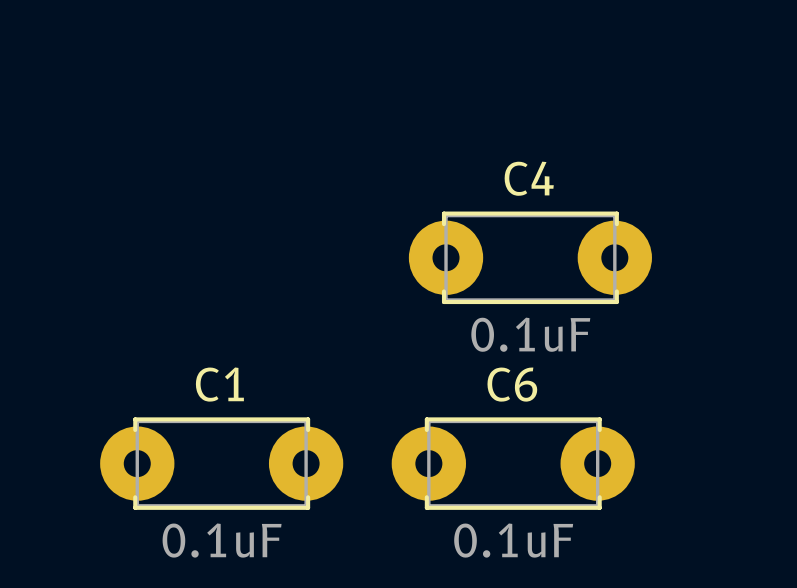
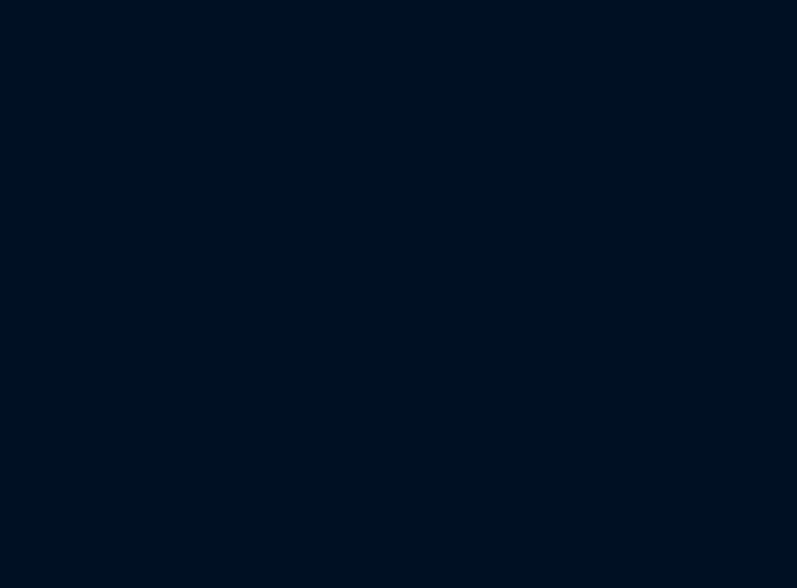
C4: 0.1uF (530, 257) -> none
C1: 0.1uF (221, 463) -> none
C6: 0.1uF (513, 463) -> none

